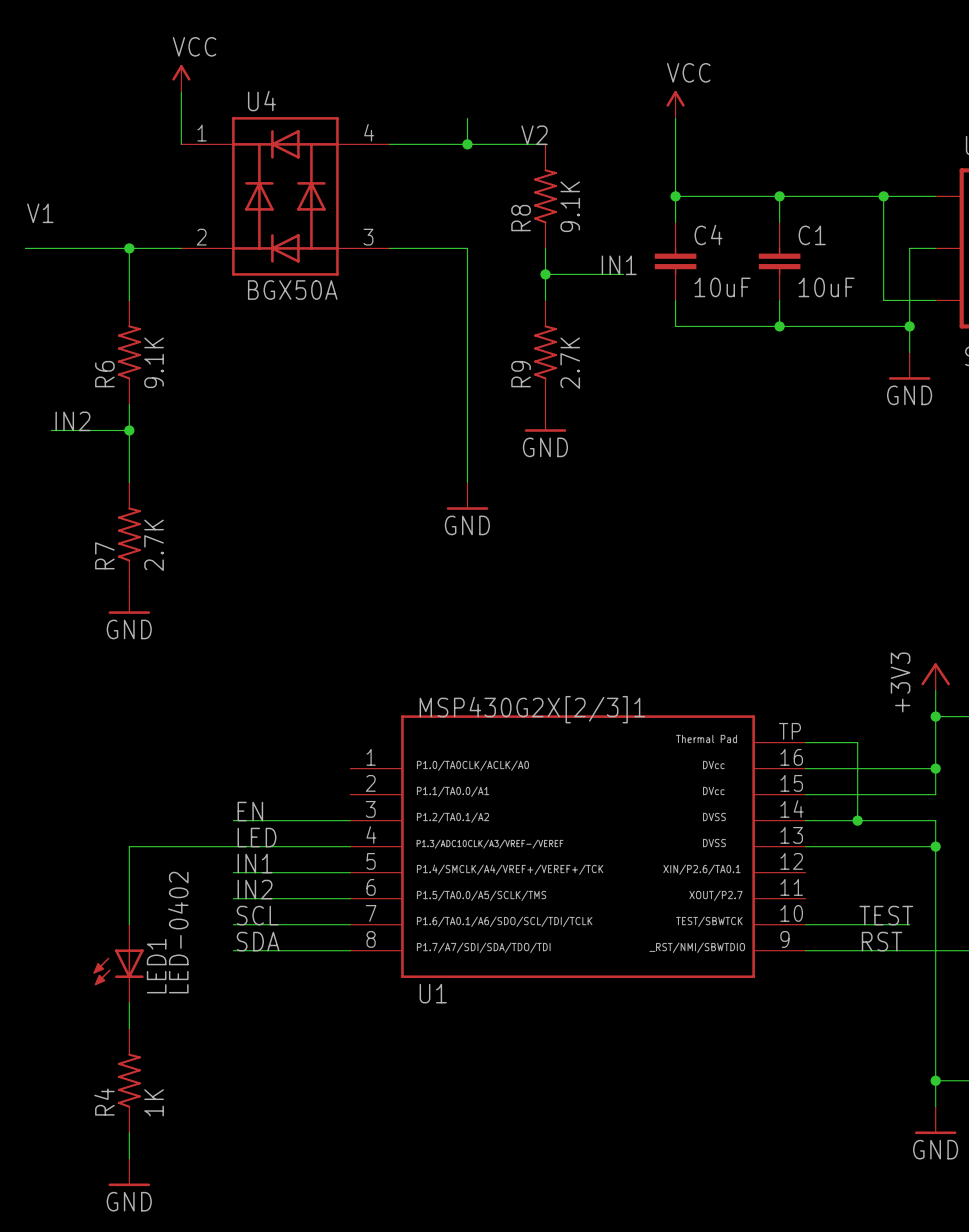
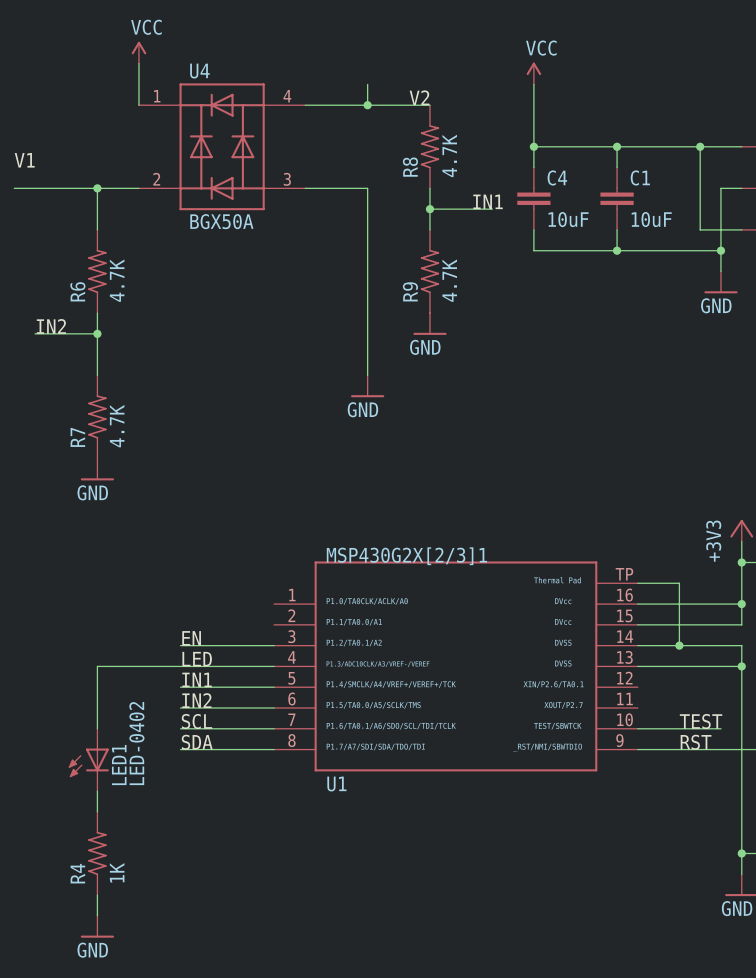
R8 value: 9.1K (570, 206) -> 4.7K (449, 155)
R6 value: 9.1K (154, 362) -> 4.7K (117, 280)
R9 value: 2.7K (570, 363) -> 4.7K (449, 280)
R7 value: 2.7K (154, 545) -> 4.7K (117, 426)

